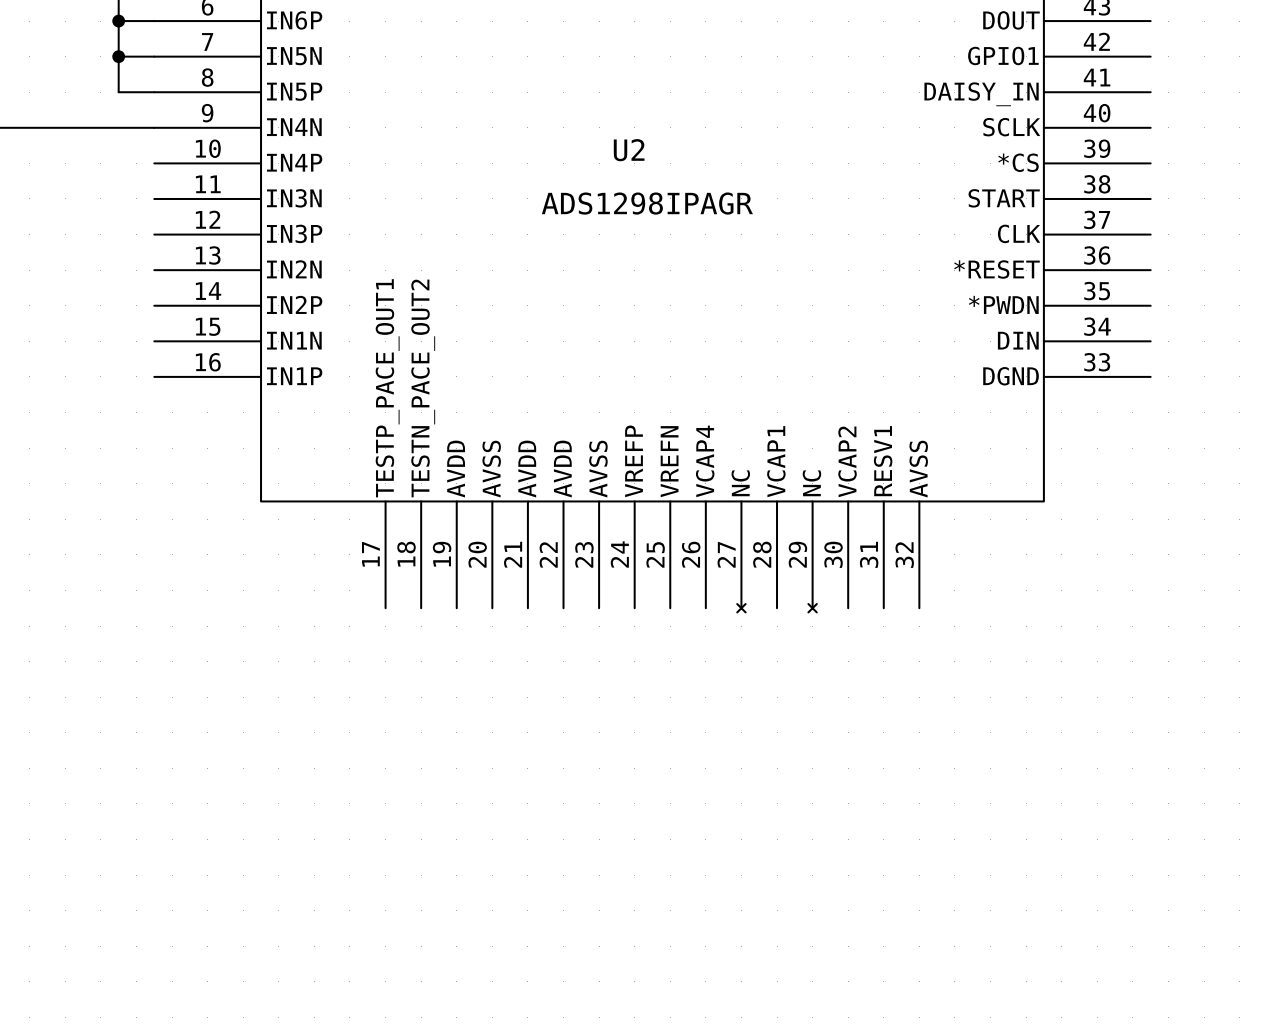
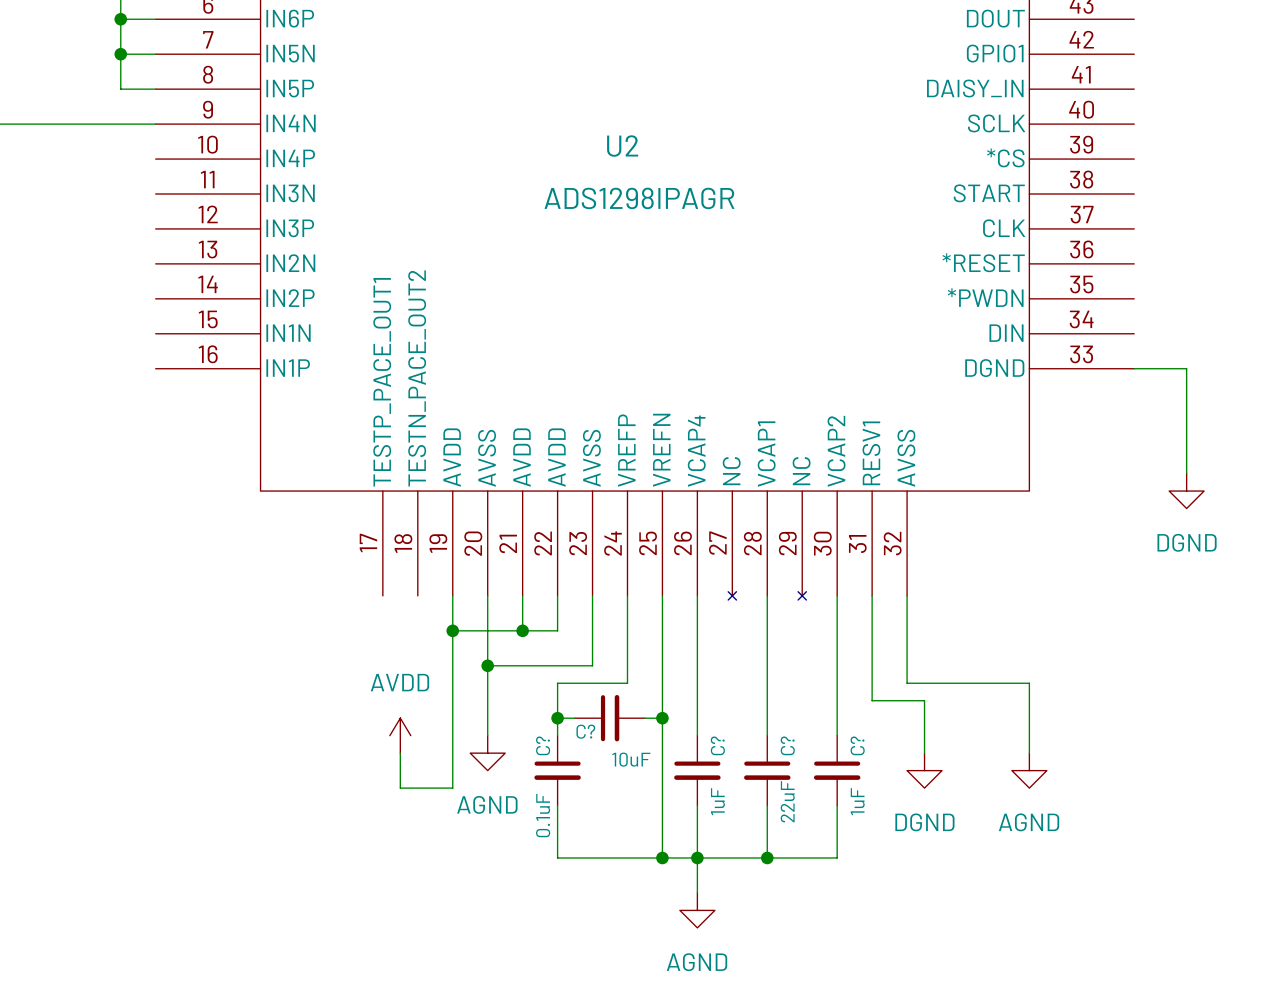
wire: none -> (1134, 368) (1186, 368) (1186, 473)
power symbol: none -> DGND (1186, 491)
wire: none -> (452, 595) (452, 788) (400, 788) (400, 753)
wire: none -> (487, 595) (487, 735)
wire: none -> (522, 595) (522, 630)
wire: none -> (557, 595) (557, 630) (452, 630)
wire: none -> (592, 595) (592, 665) (487, 665)
wire: none -> (627, 595) (627, 683) (557, 683) (557, 735)
wire: none -> (662, 595) (662, 857)
wire: none -> (697, 595) (697, 735)
wire: none -> (767, 595) (767, 735)
wire: none -> (837, 595) (837, 735)
wire: none -> (872, 595) (872, 700) (924, 700) (924, 753)
wire: none -> (907, 595) (907, 683) (1029, 683) (1029, 753)
junction: none -> (452, 630)
junction: none -> (522, 630)
junction: none -> (487, 665)
wire: none -> (557, 718) (575, 718)
junction: none -> (557, 718)
C?: none -> 10uF (610, 718)
wire: none -> (644, 718) (662, 718)
junction: none -> (662, 718)
power symbol: none -> AVDD (400, 735)
power symbol: none -> AGND (487, 753)
C?: none -> 0.1uF (557, 770)
C?: none -> 1uF (697, 770)
C?: none -> 22uF (767, 770)
C?: none -> 1uF (837, 770)
power symbol: none -> DGND (924, 770)
power symbol: none -> AGND (1029, 770)
wire: none -> (557, 805) (557, 857) (837, 857) (837, 805)
wire: none -> (697, 805) (697, 892)
wire: none -> (767, 805) (767, 857)
junction: none -> (662, 857)
junction: none -> (697, 857)
junction: none -> (767, 857)
power symbol: none -> AGND (697, 910)

